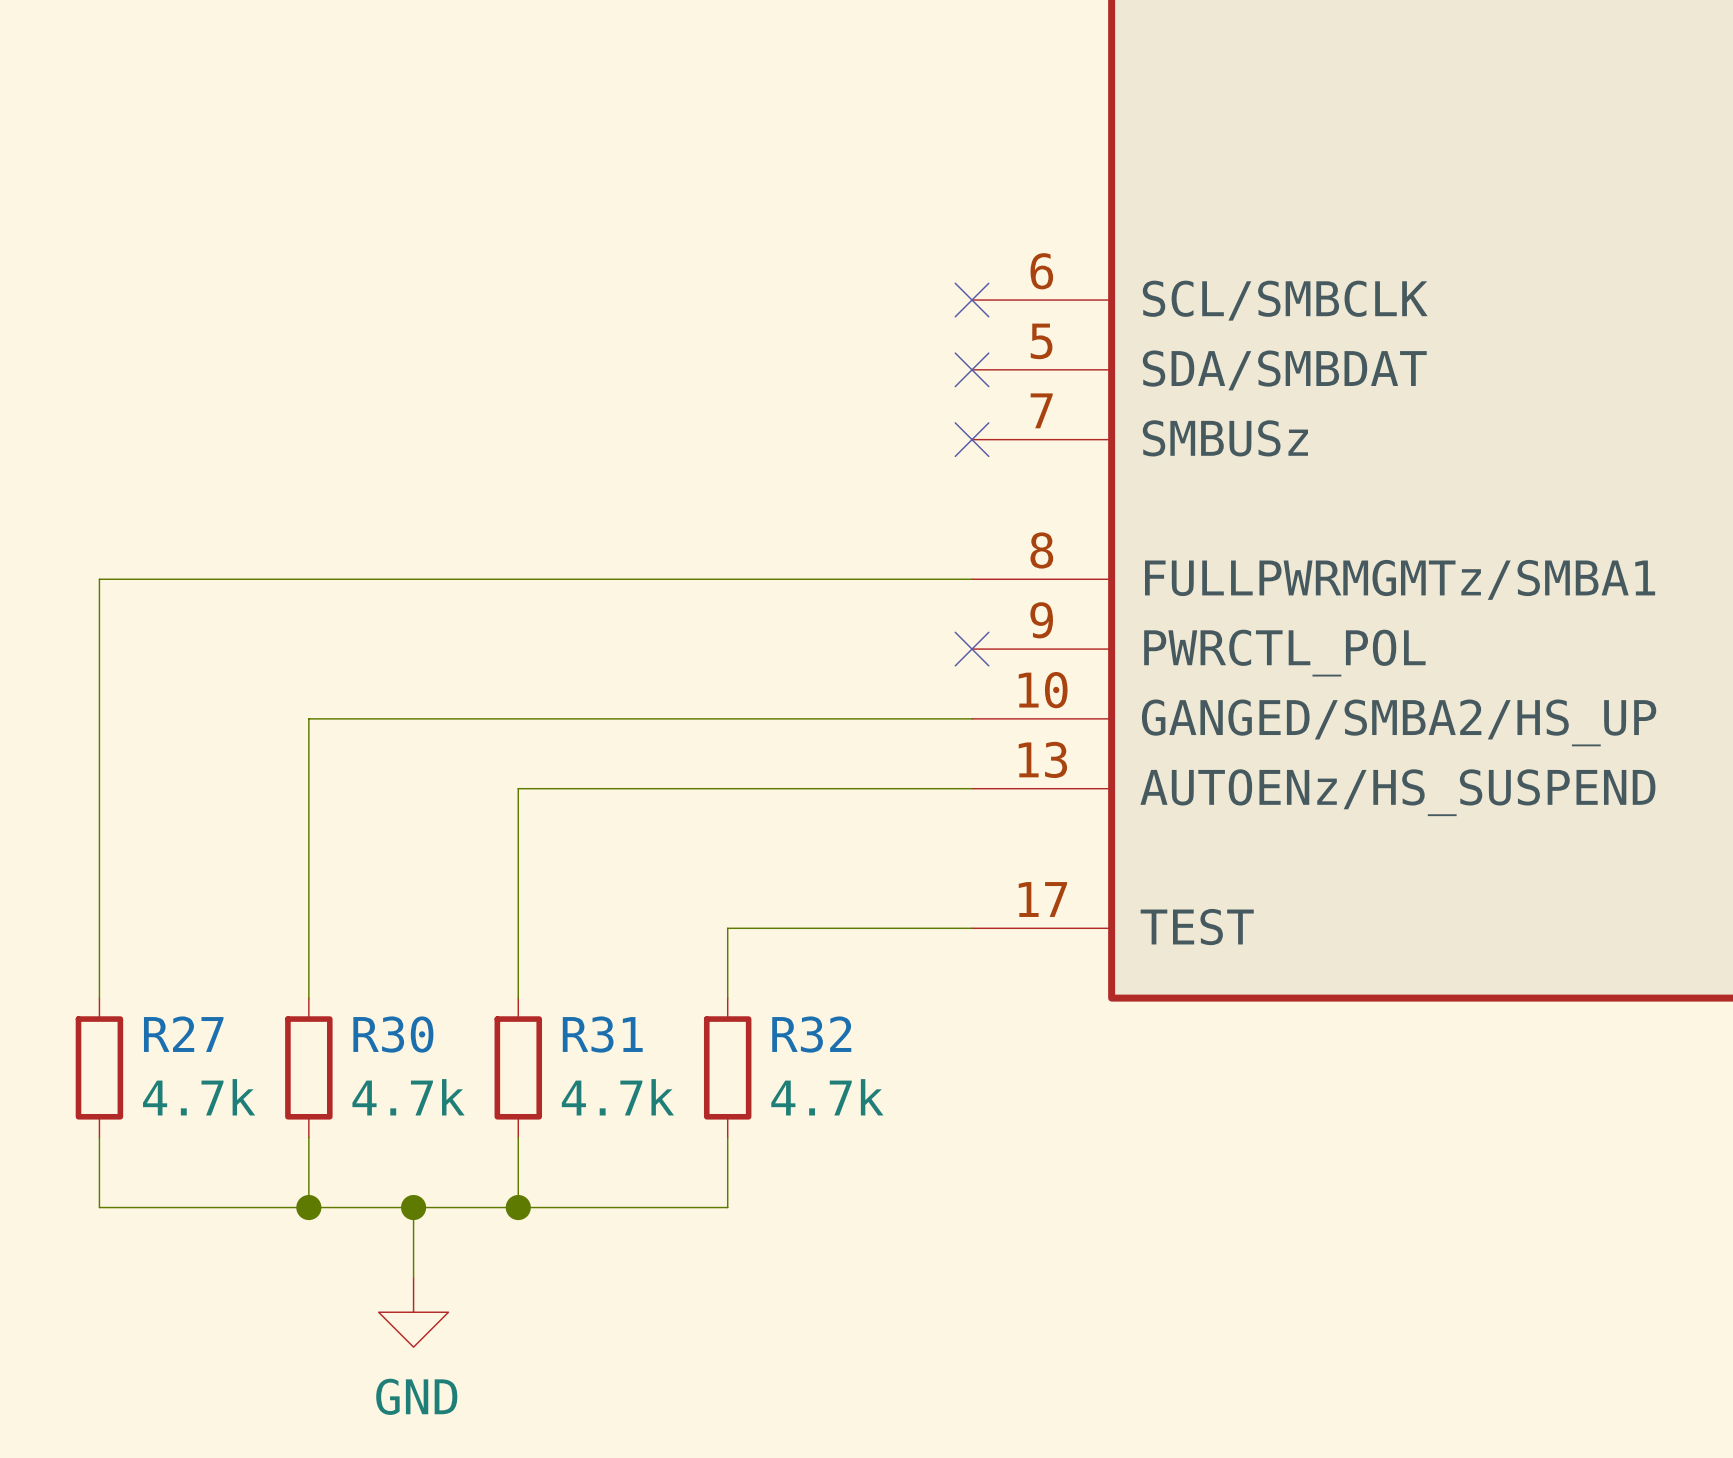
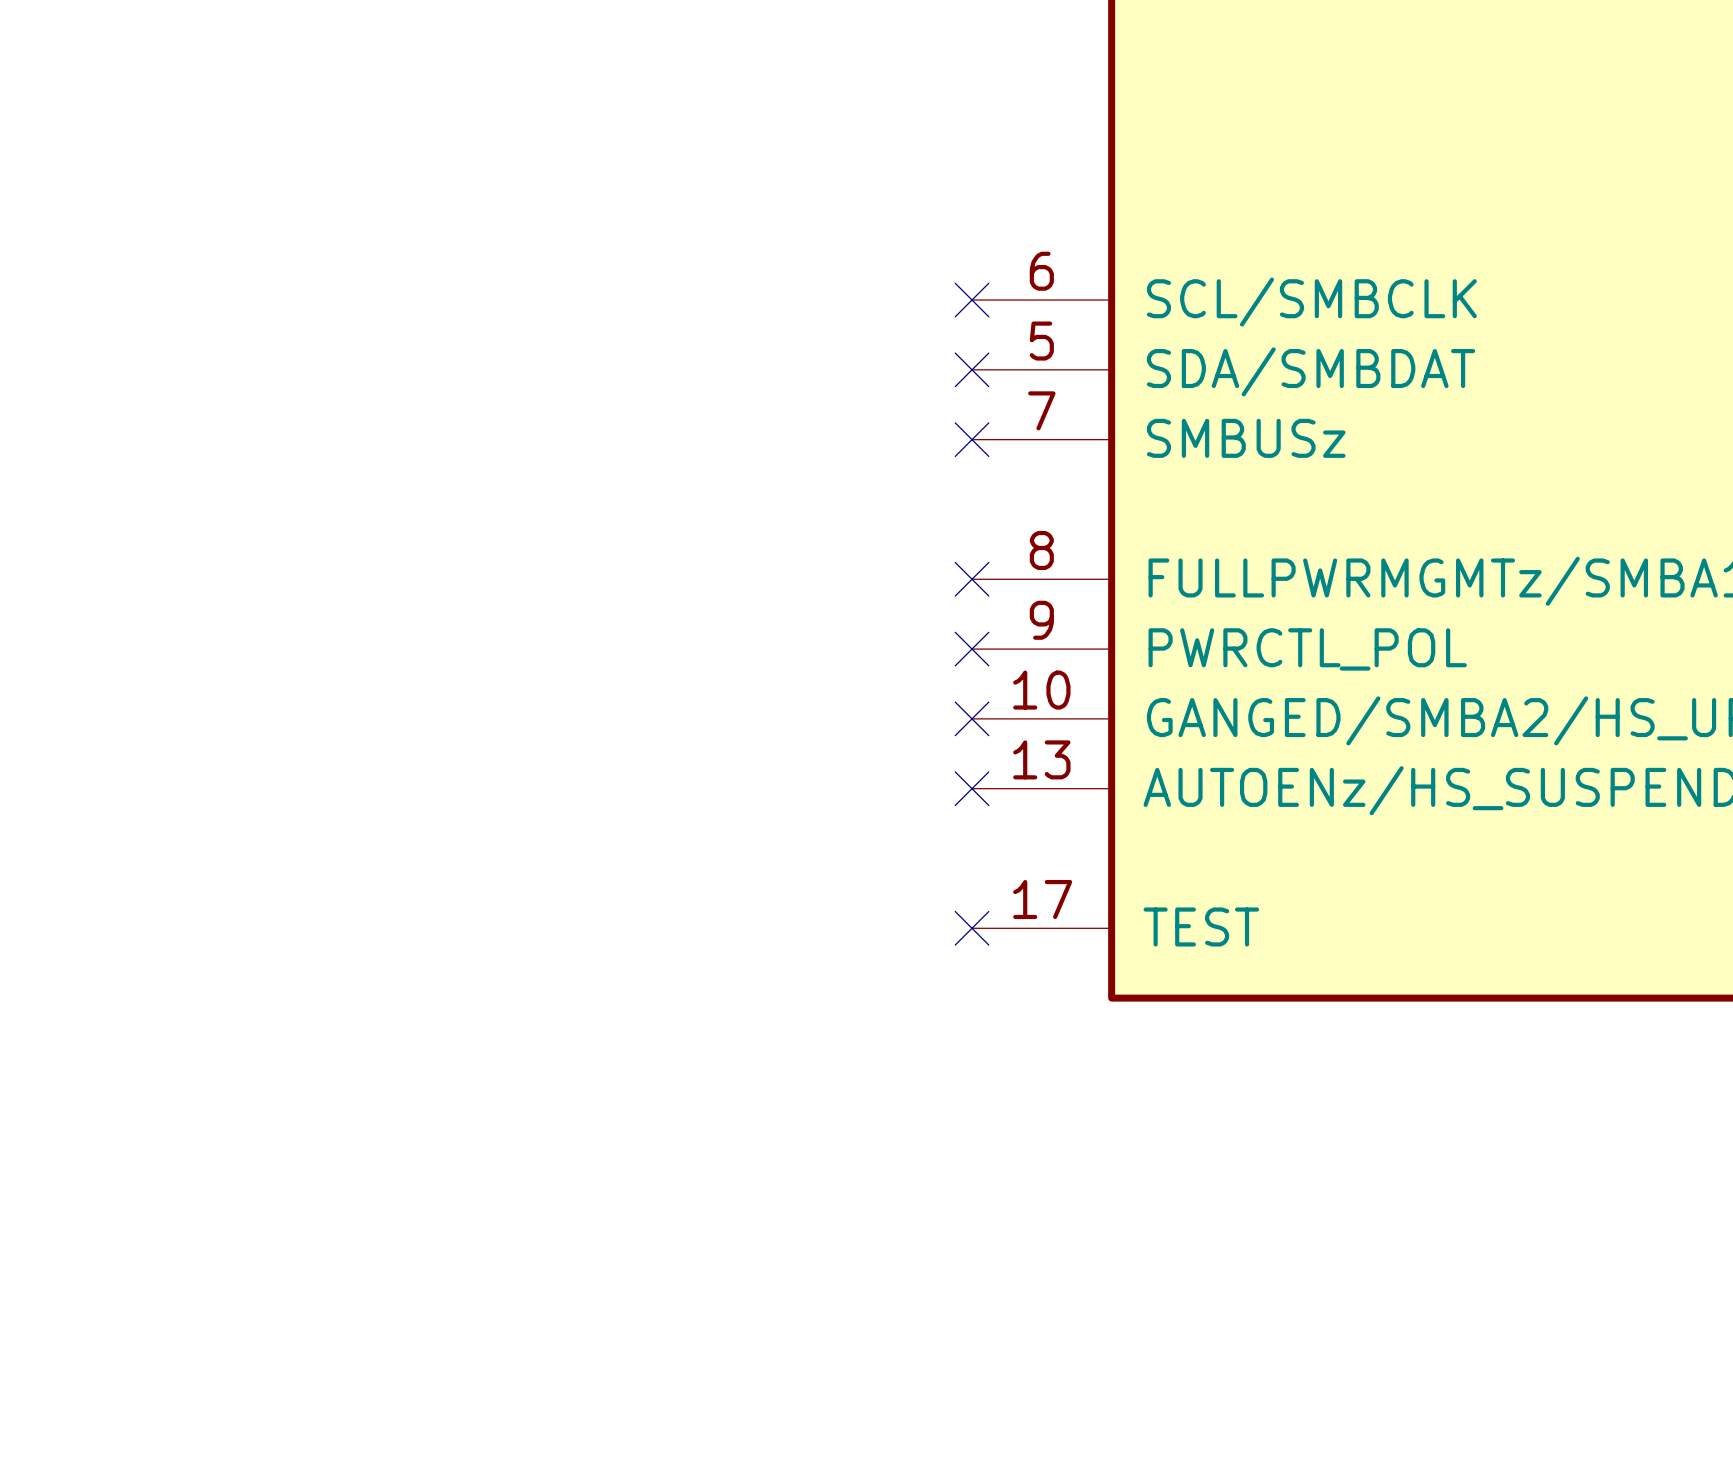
wire: (972, 579) (99, 579) (99, 998) -> none
no-connect mark: none -> (972, 579)
wire: (972, 718) (308, 718) (308, 998) -> none
no-connect mark: none -> (972, 718)
wire: (972, 788) (518, 788) (518, 998) -> none
no-connect mark: none -> (972, 788)
wire: (972, 928) (727, 928) (727, 998) -> none
no-connect mark: none -> (972, 928)
R27: 4.7k (99, 1067) -> none
R30: 4.7k (308, 1067) -> none
R31: 4.7k (518, 1067) -> none
R32: 4.7k (727, 1067) -> none
wire: (99, 1137) (99, 1207) (727, 1207) (727, 1137) -> none
wire: (308, 1137) (308, 1207) -> none
wire: (518, 1137) (518, 1207) -> none
junction: (308, 1207) -> none
wire: (413, 1207) (413, 1277) -> none
junction: (413, 1207) -> none
junction: (518, 1207) -> none
power symbol: GND (413, 1312) -> none

